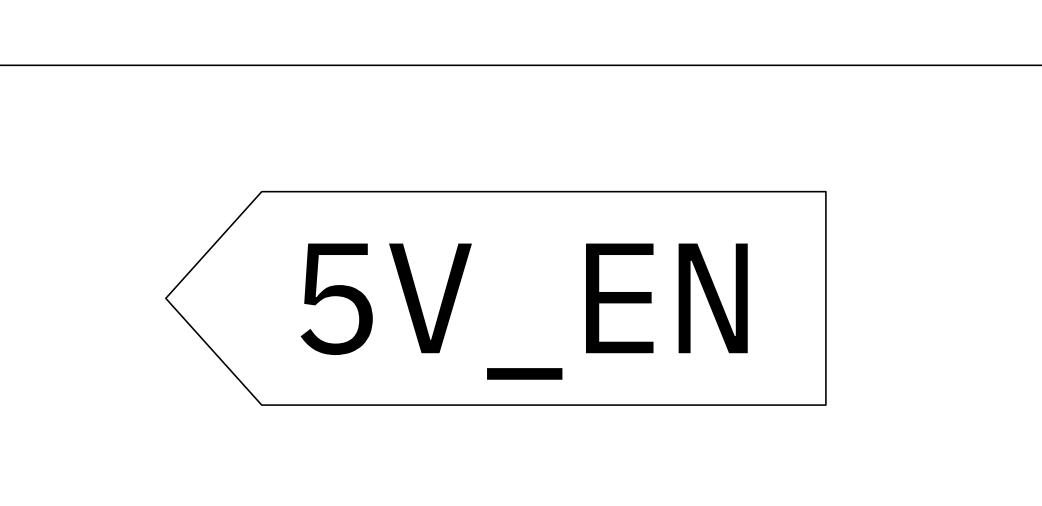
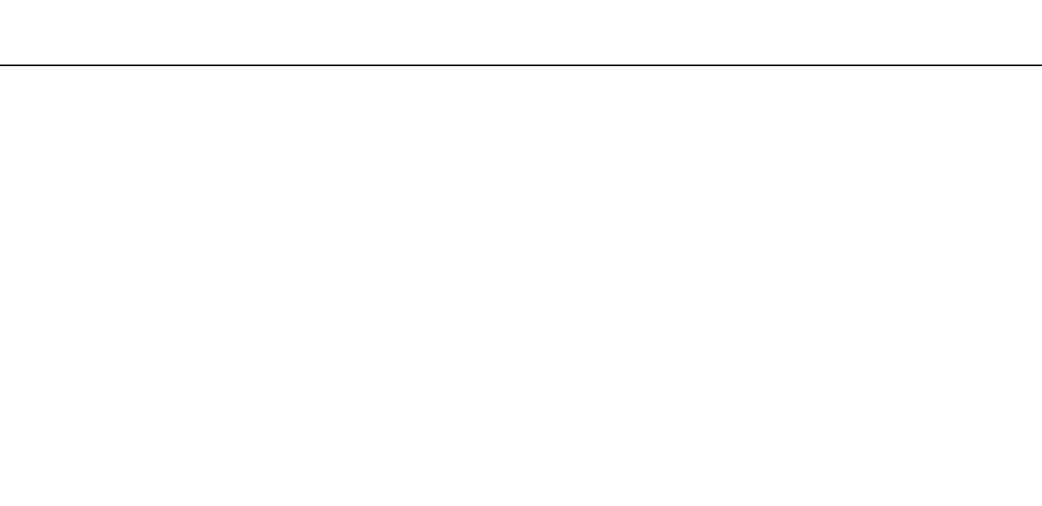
global label: 5V_EN (524, 311) -> none

